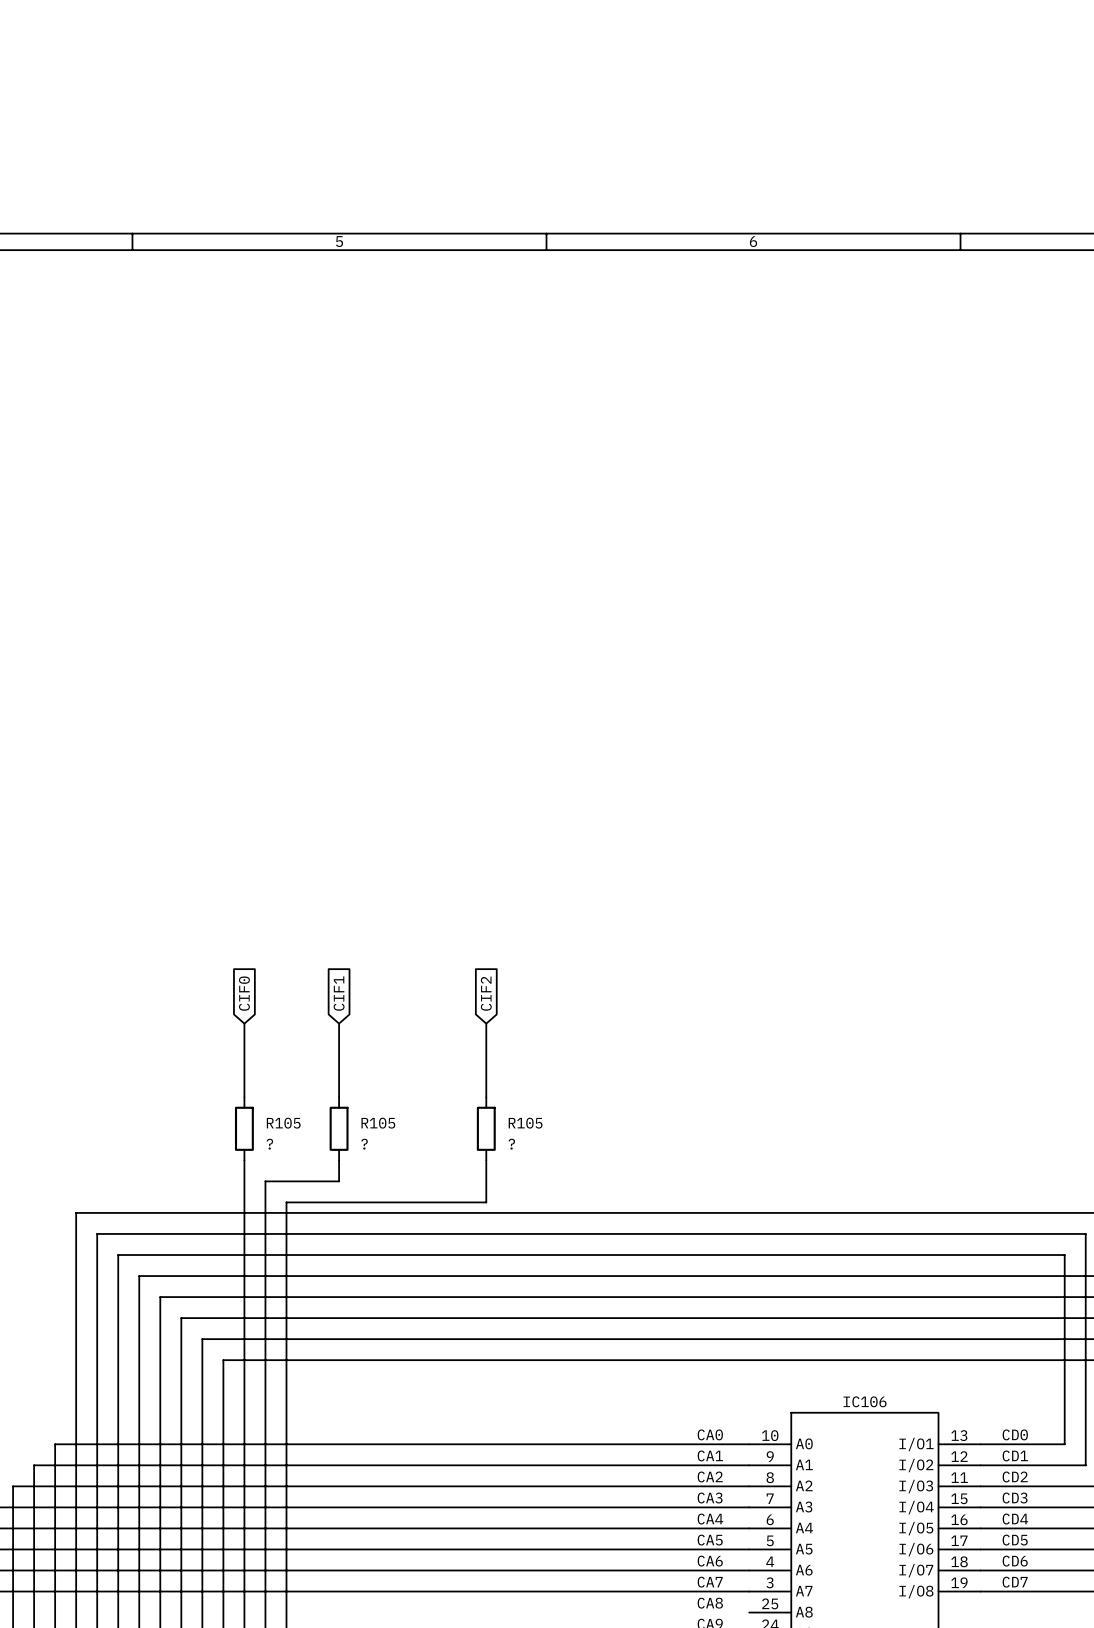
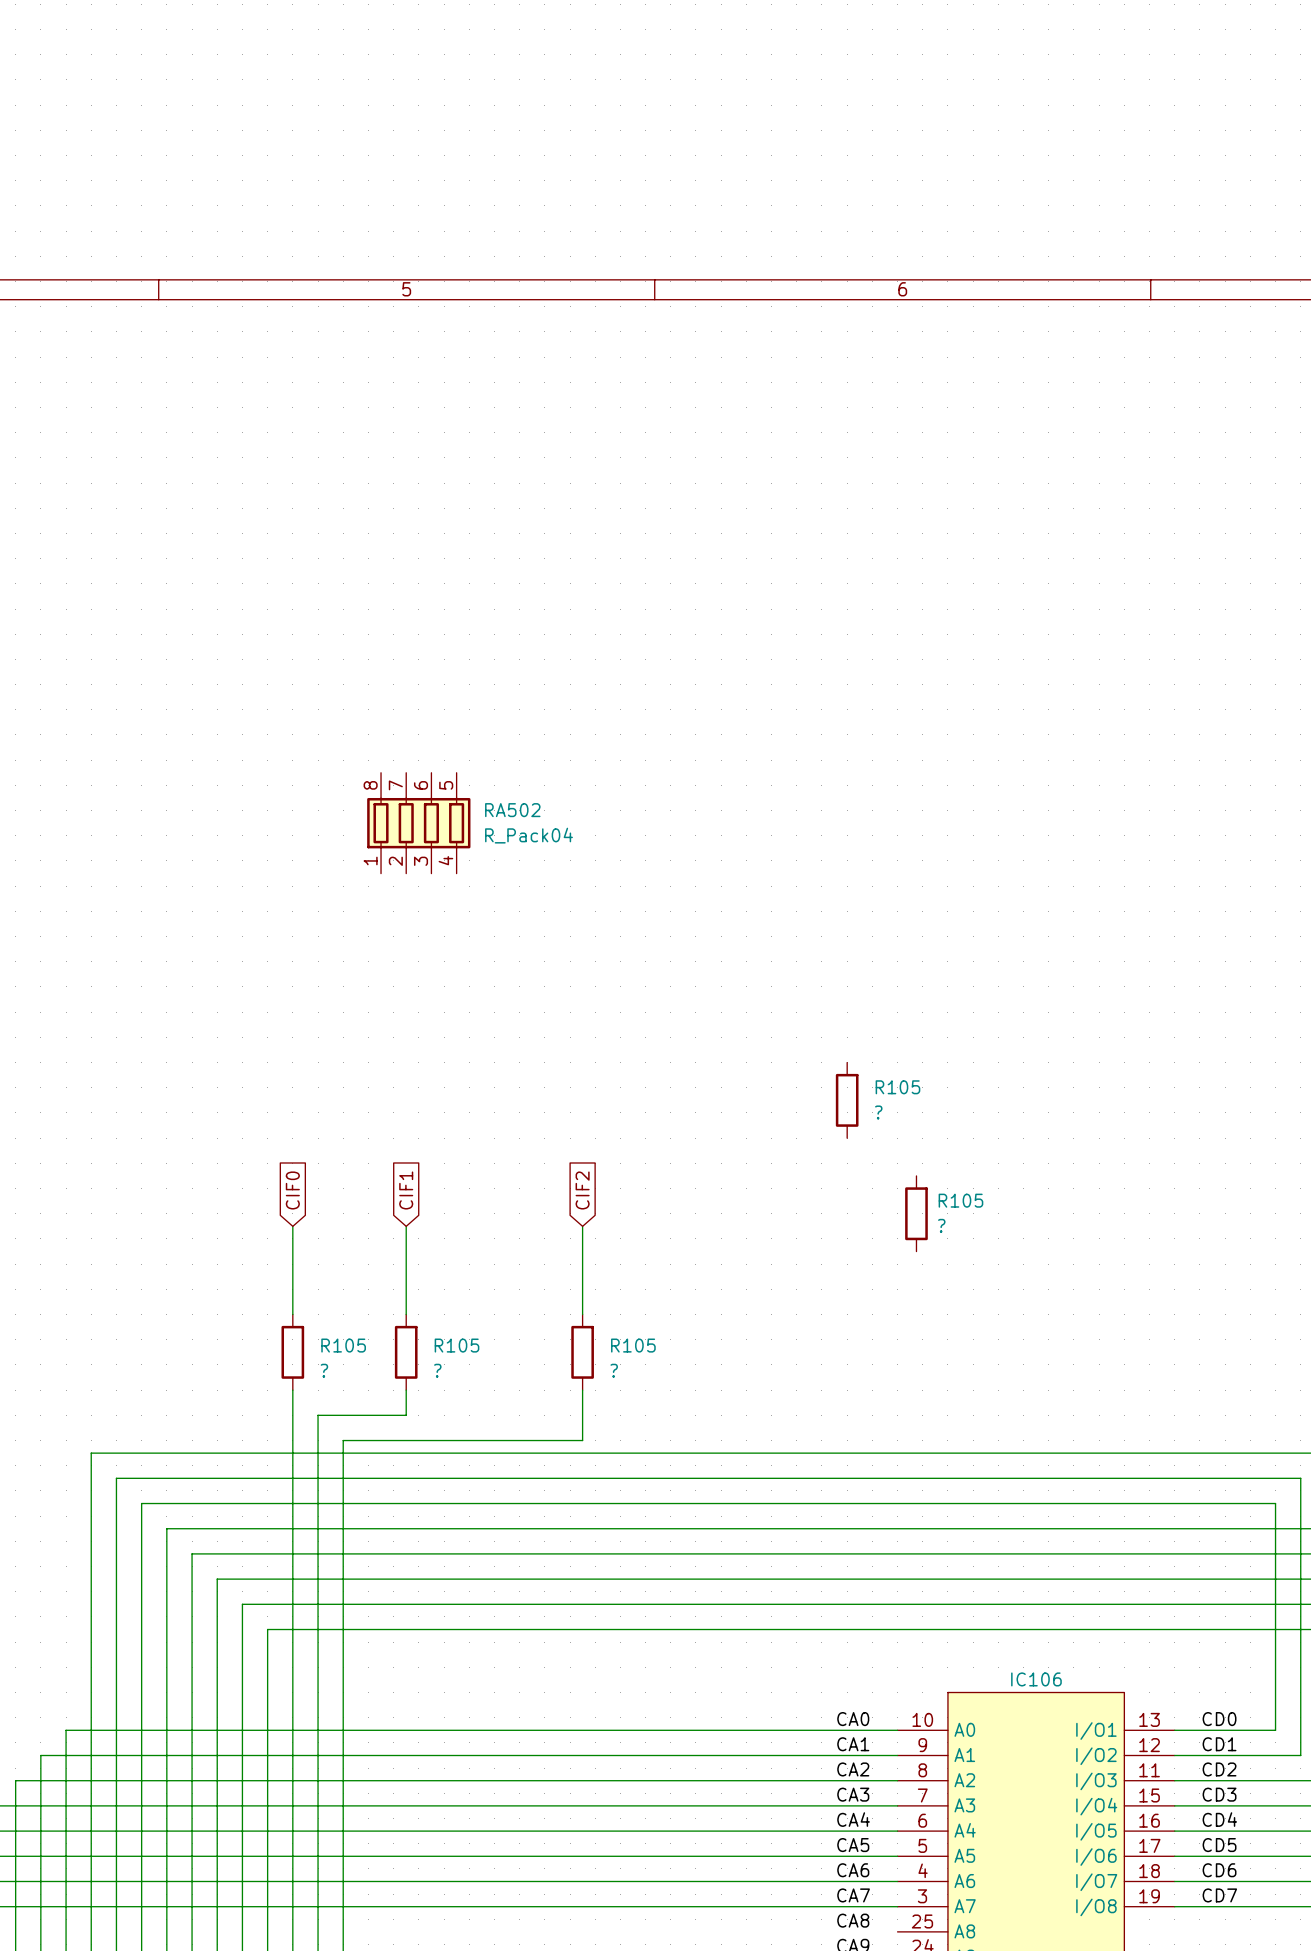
RA502: none -> R_Pack04 (418, 823)
R105: none -> ? (847, 1100)
R105: none -> ? (916, 1213)

